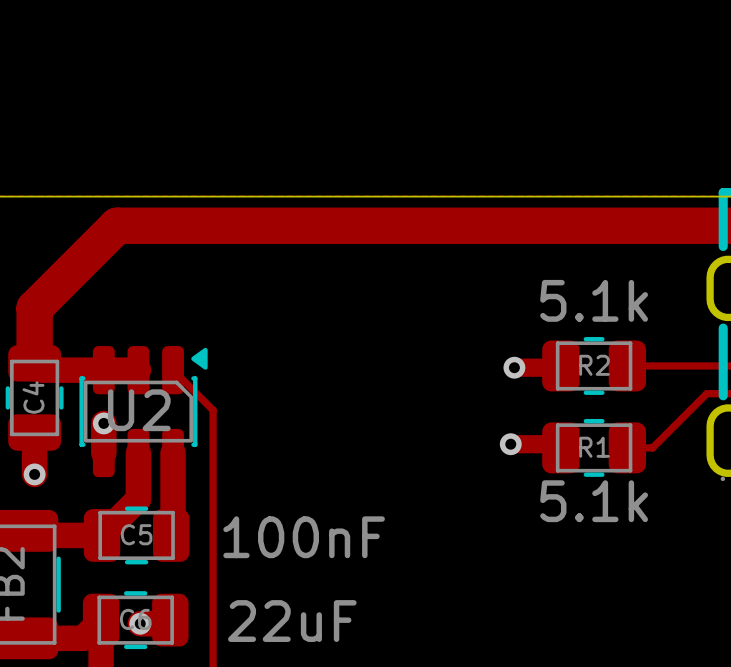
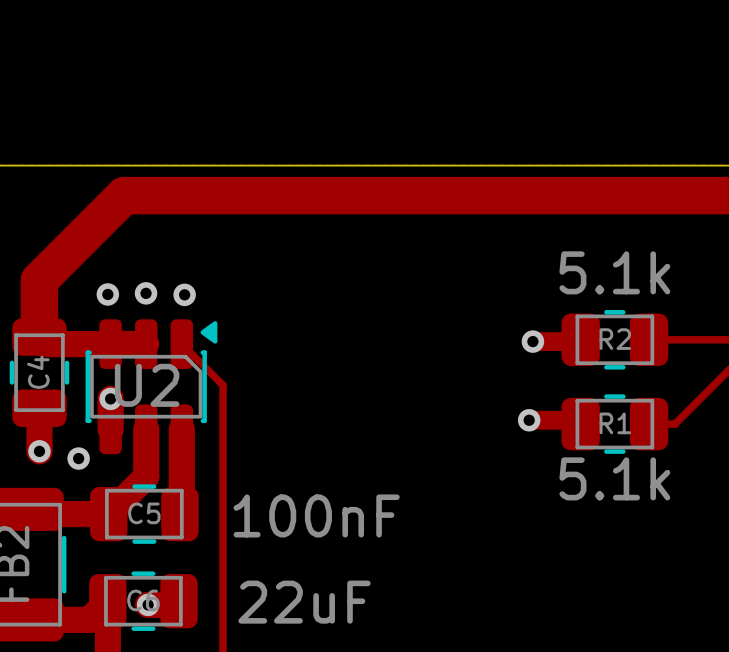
via: none -> (146, 293)
via: none -> (107, 294)
via: none -> (184, 294)
via: none -> (78, 458)

